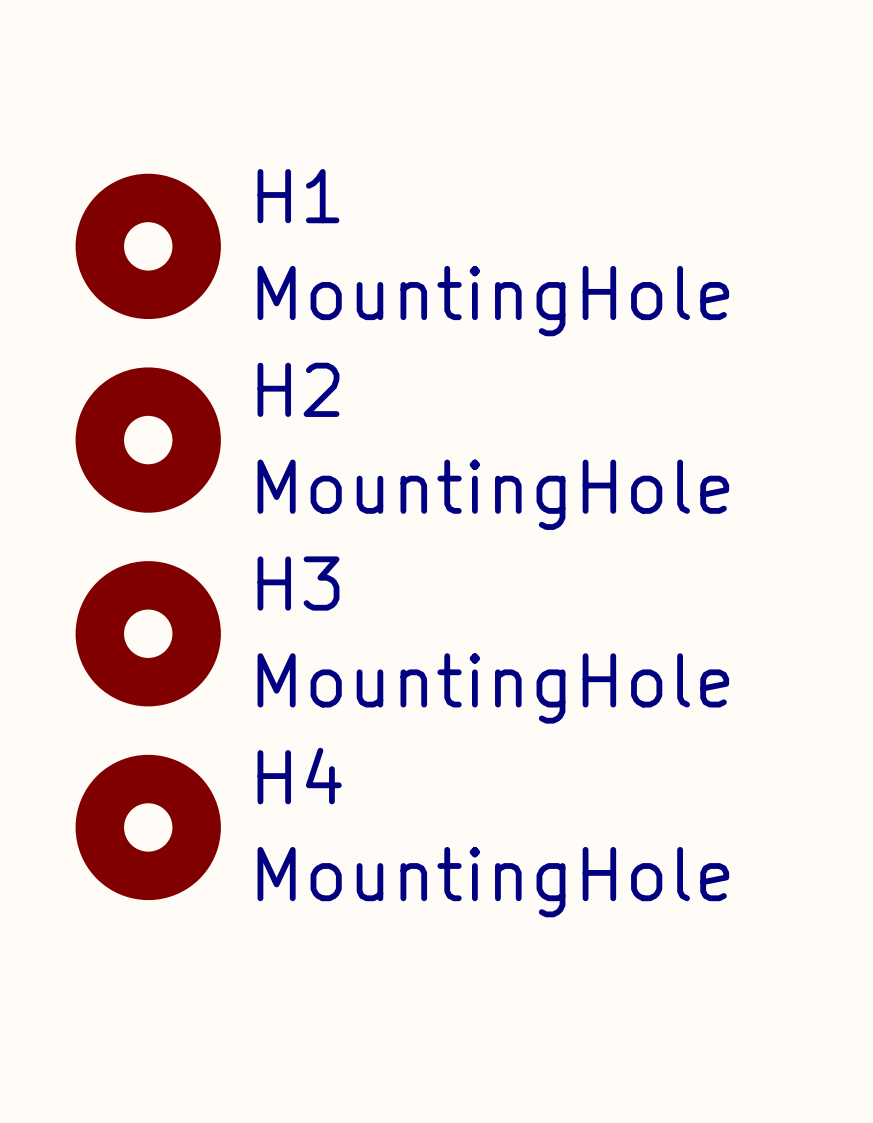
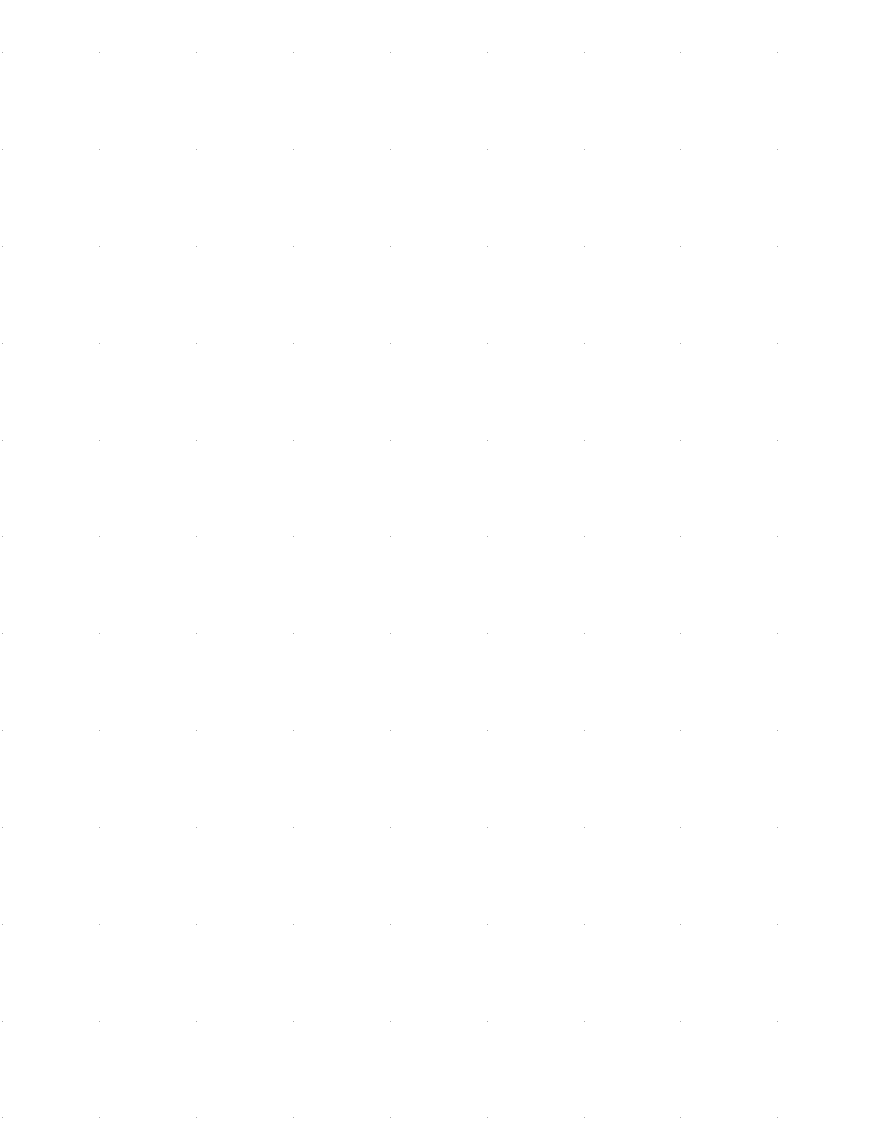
H1: MountingHole (148, 246) -> none
H2: MountingHole (148, 440) -> none
H3: MountingHole (148, 633) -> none
H4: MountingHole (148, 827) -> none

